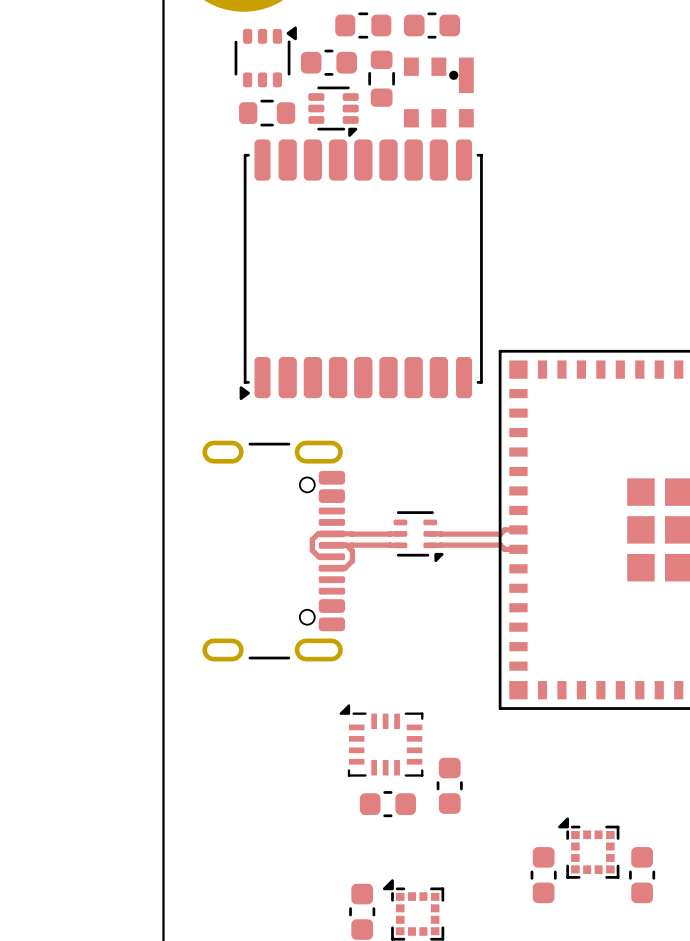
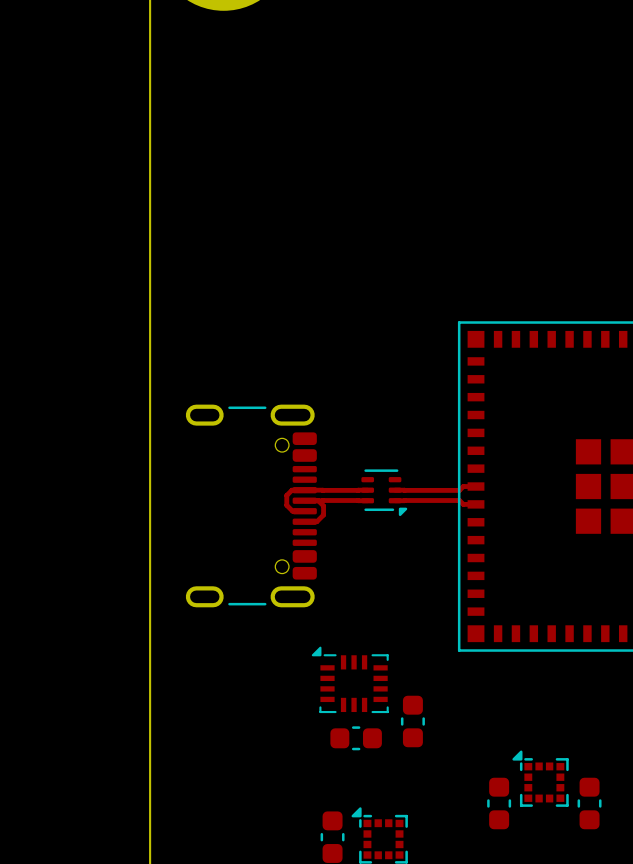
part: (363, 25) -> none
part: (431, 25) -> none
part: (265, 56) -> none
part: (328, 62) -> none
part: (381, 78) -> none
part: (438, 92) -> none
part: (333, 111) -> none
part: (267, 113) -> none
part: (361, 269) -> none

